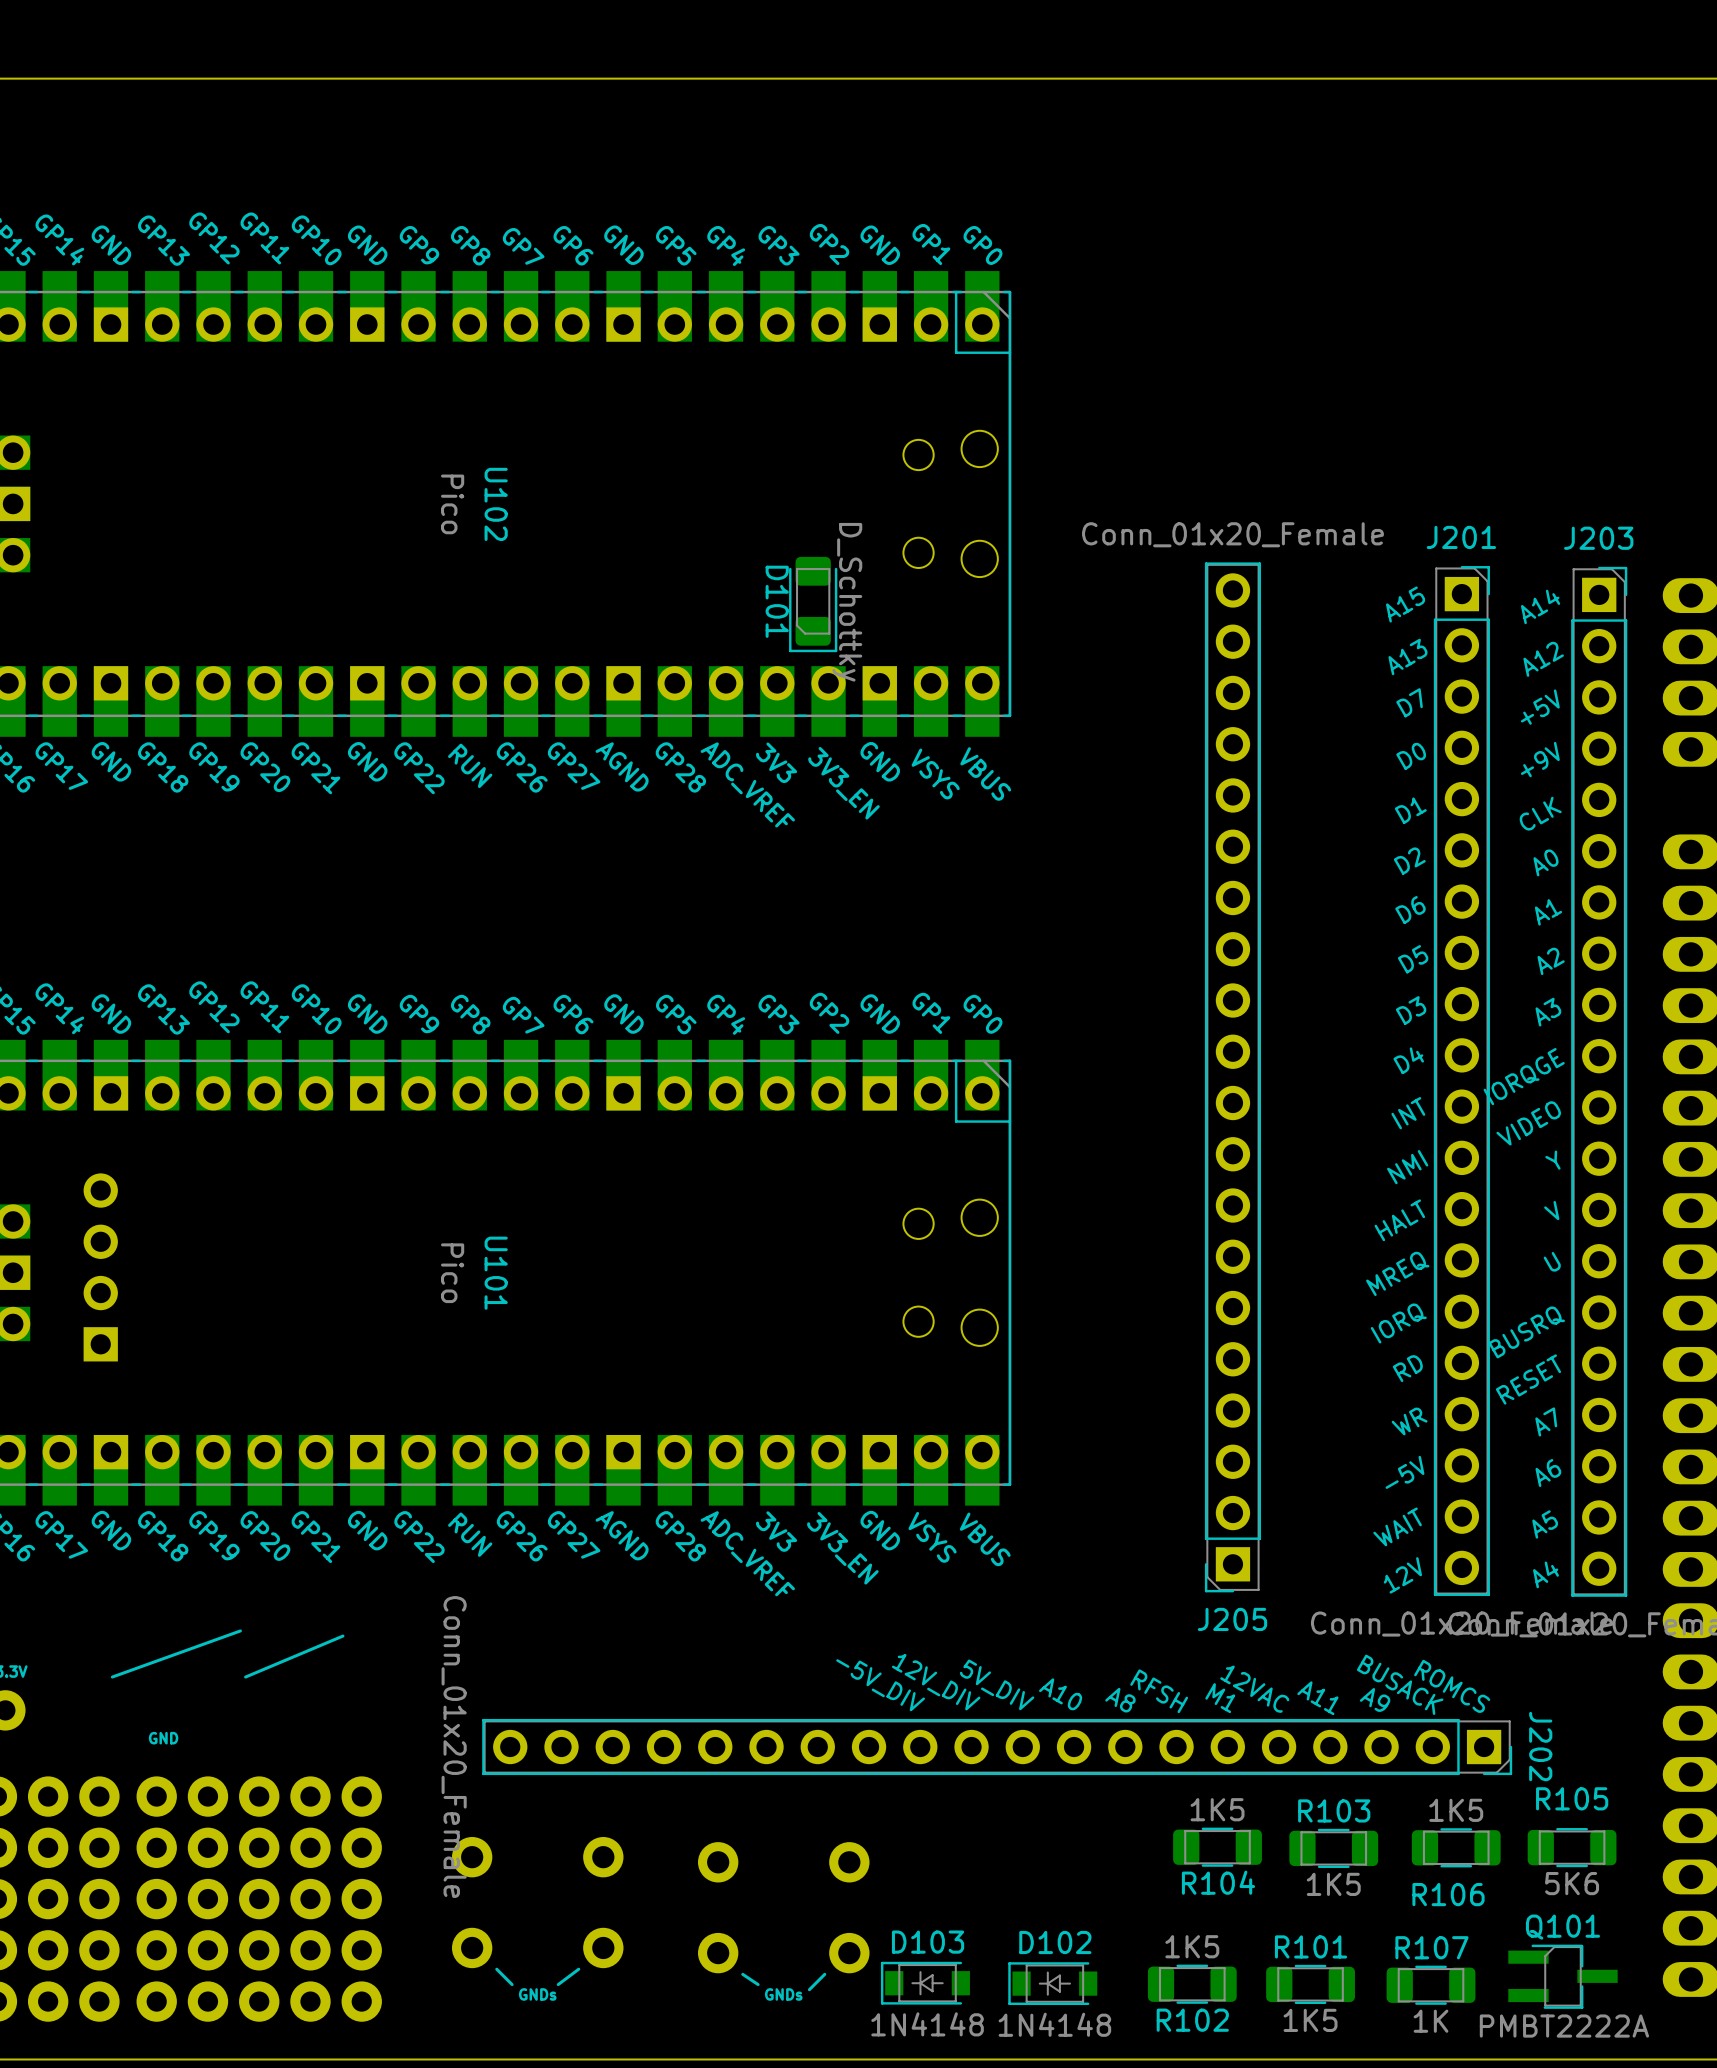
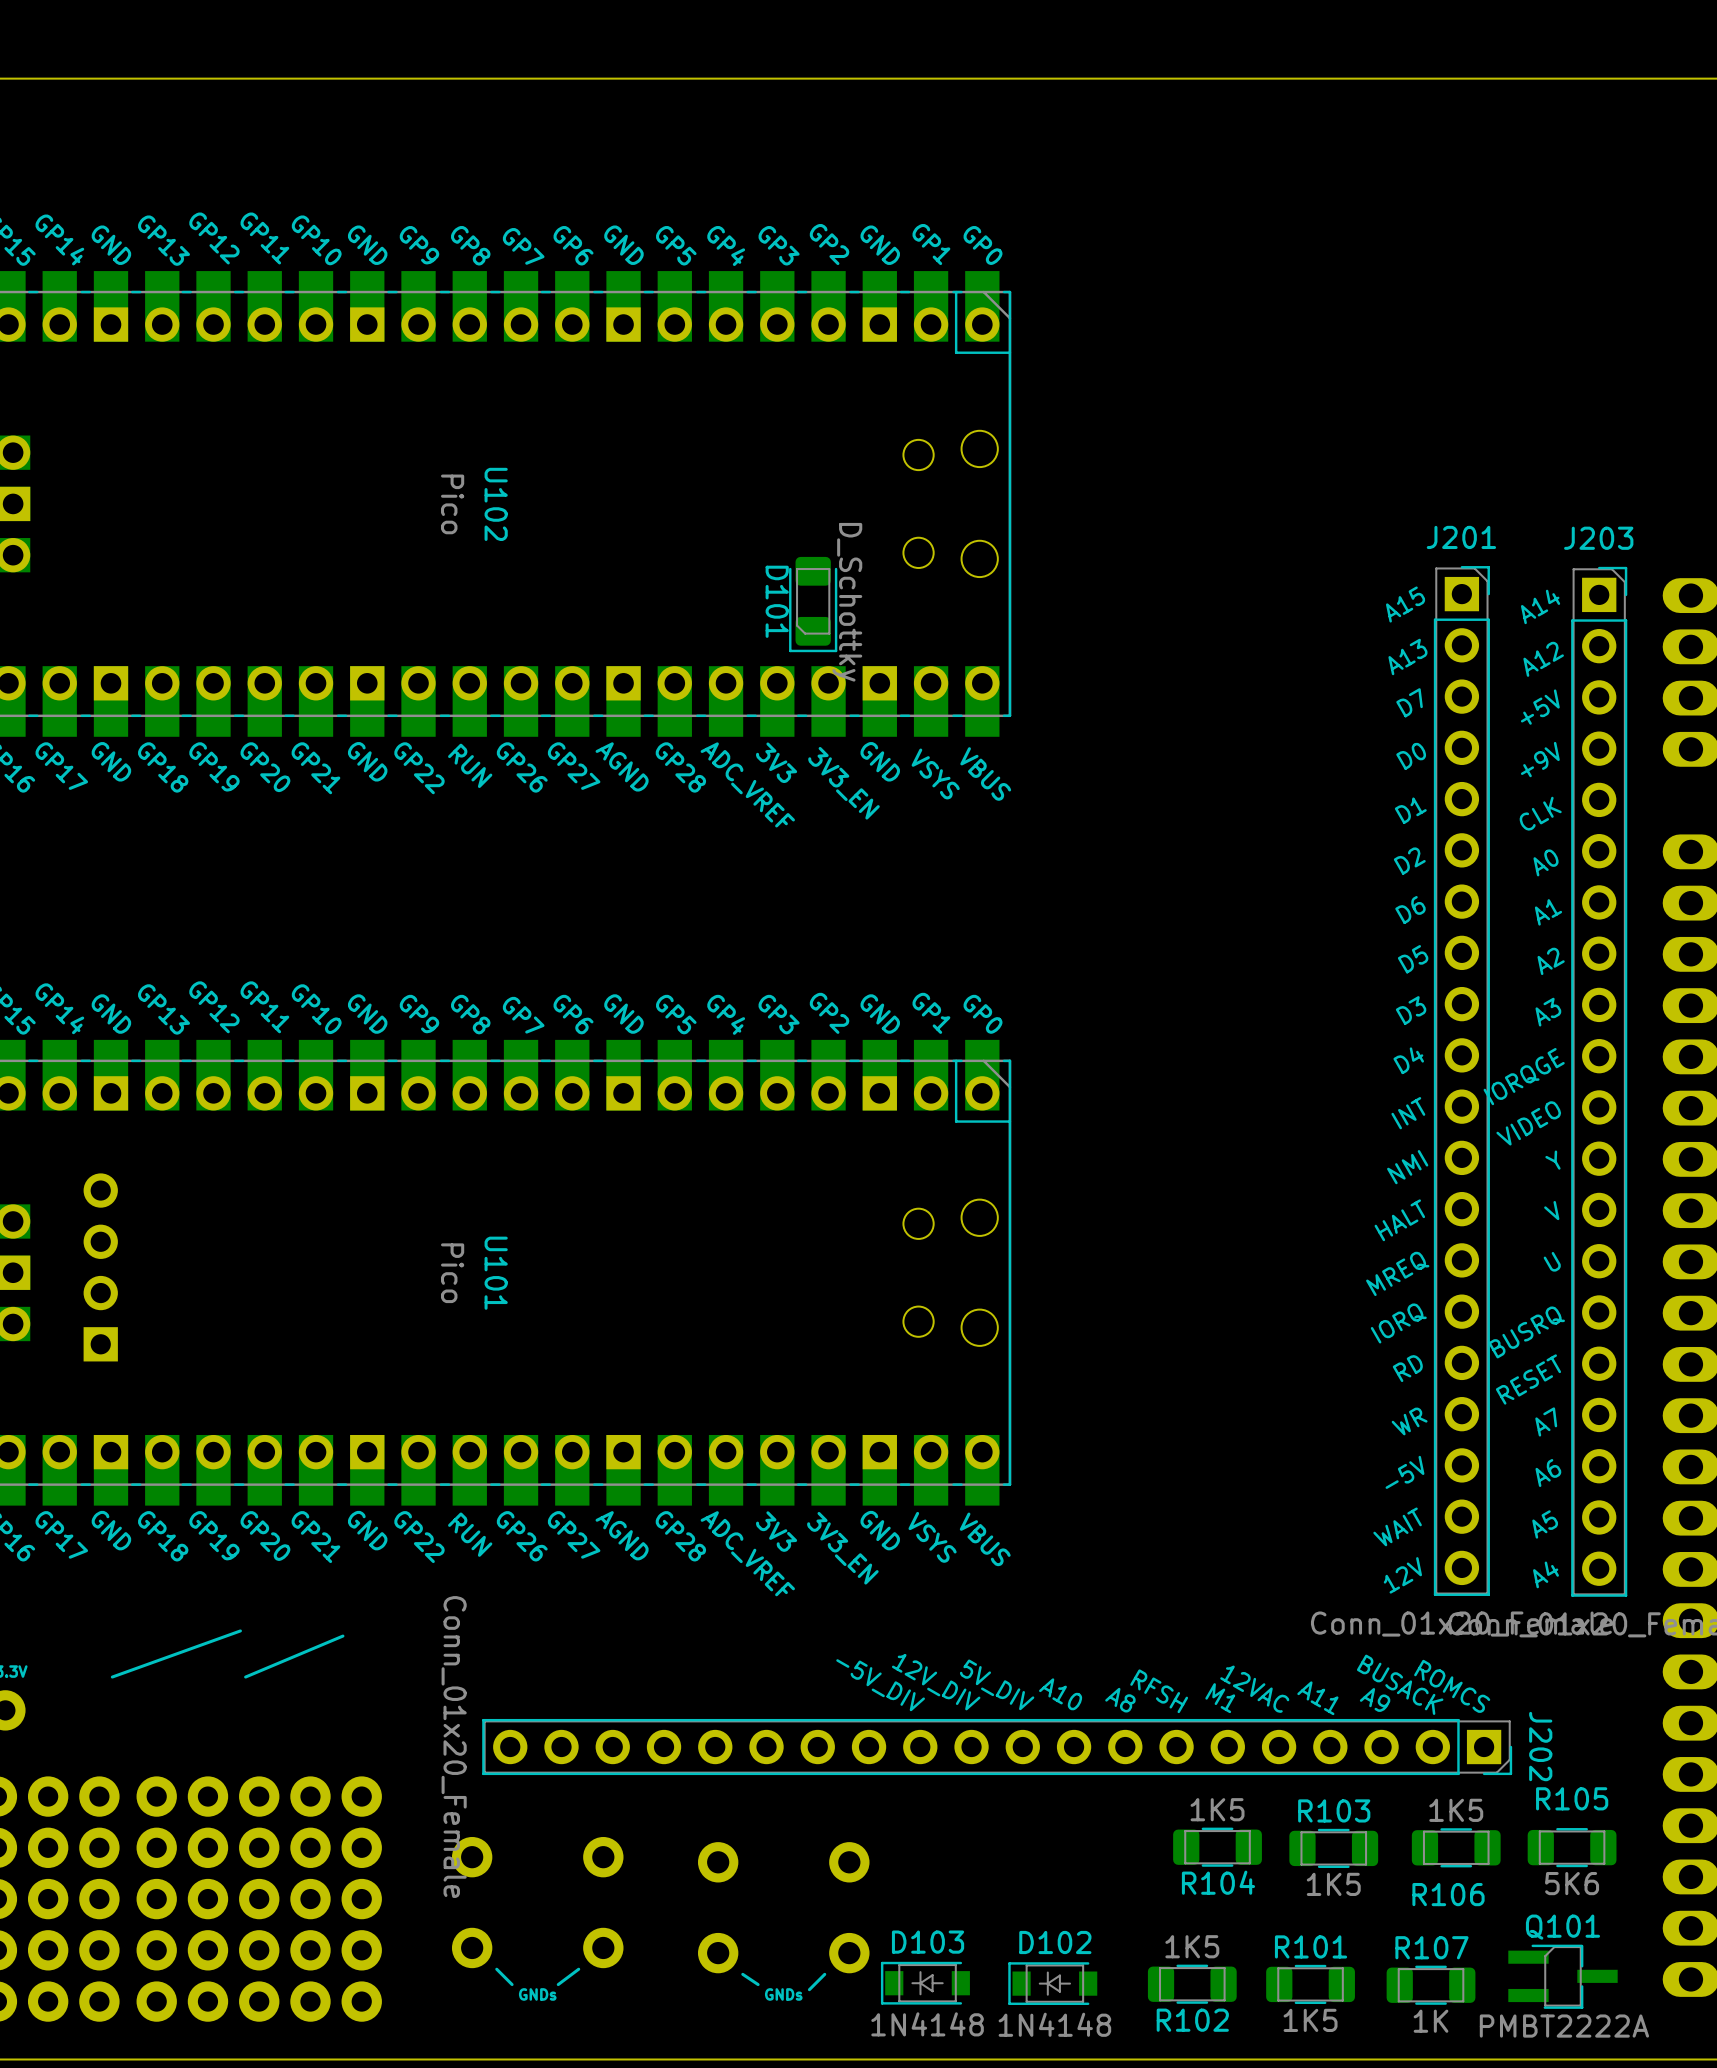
J205: Conn_01x20_Female (1232, 1077) -> none
text: GND (163, 1738) -> none

